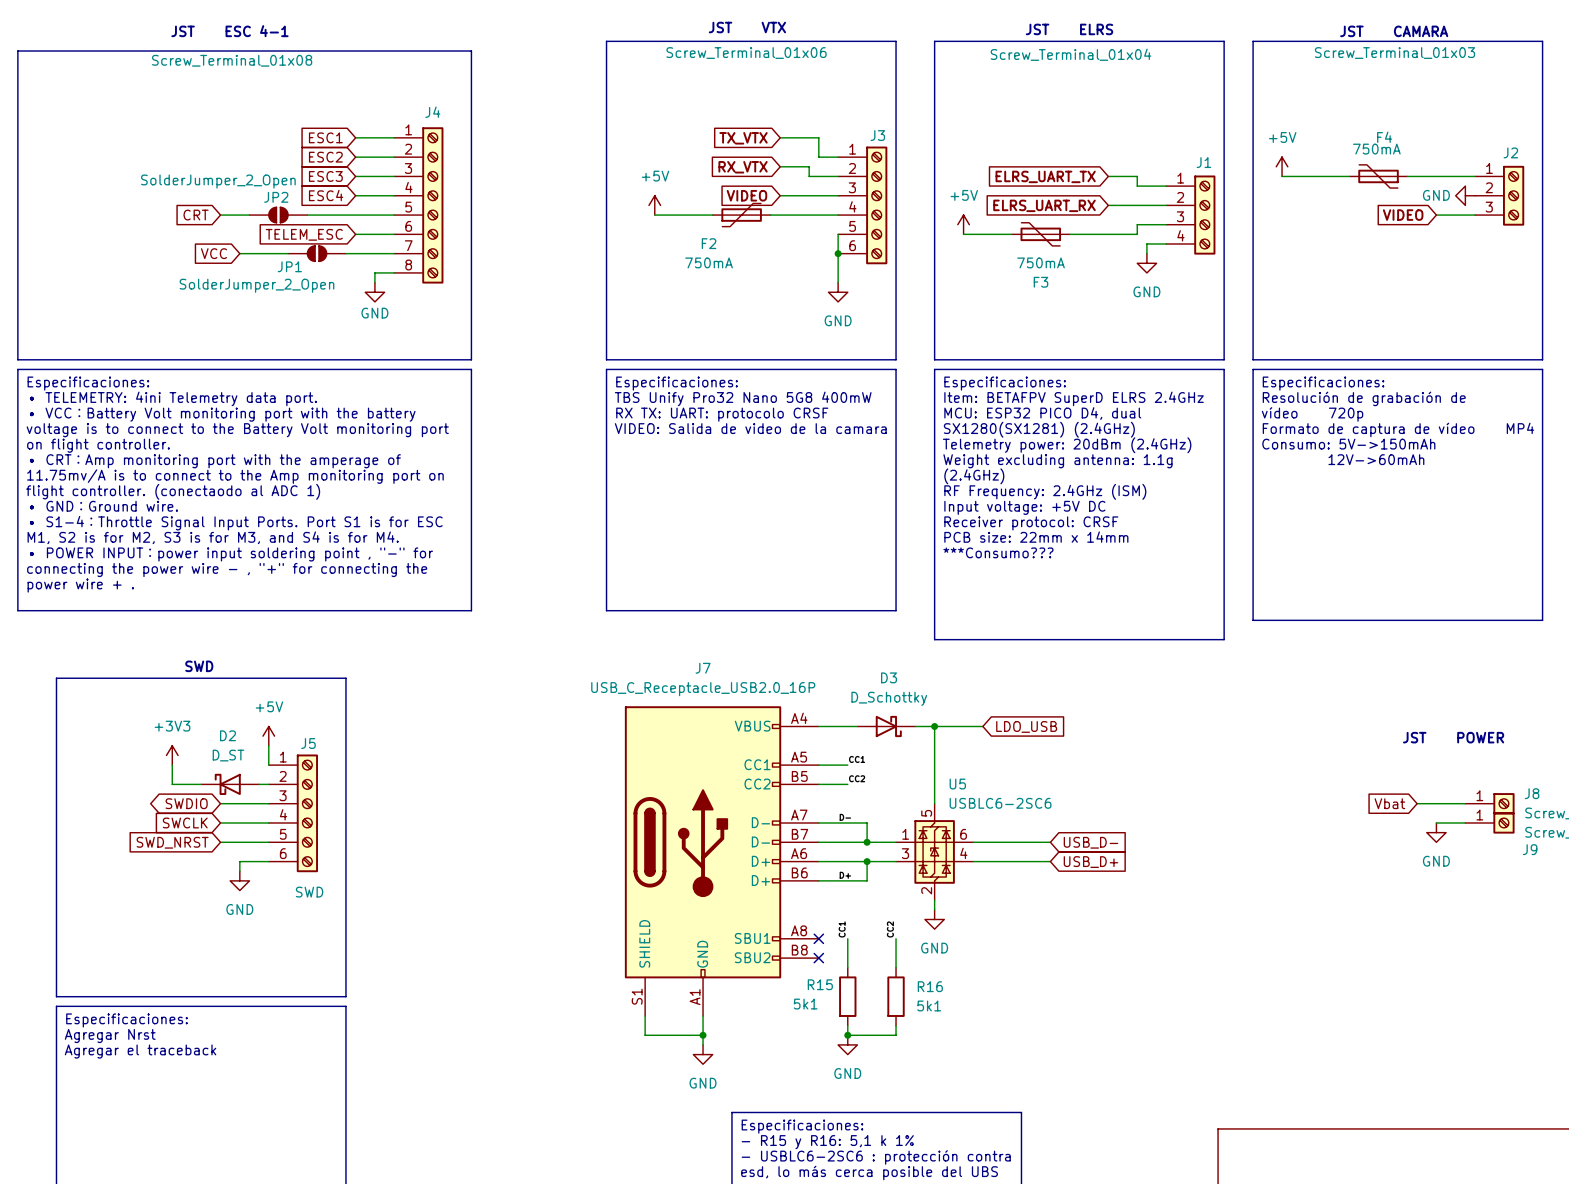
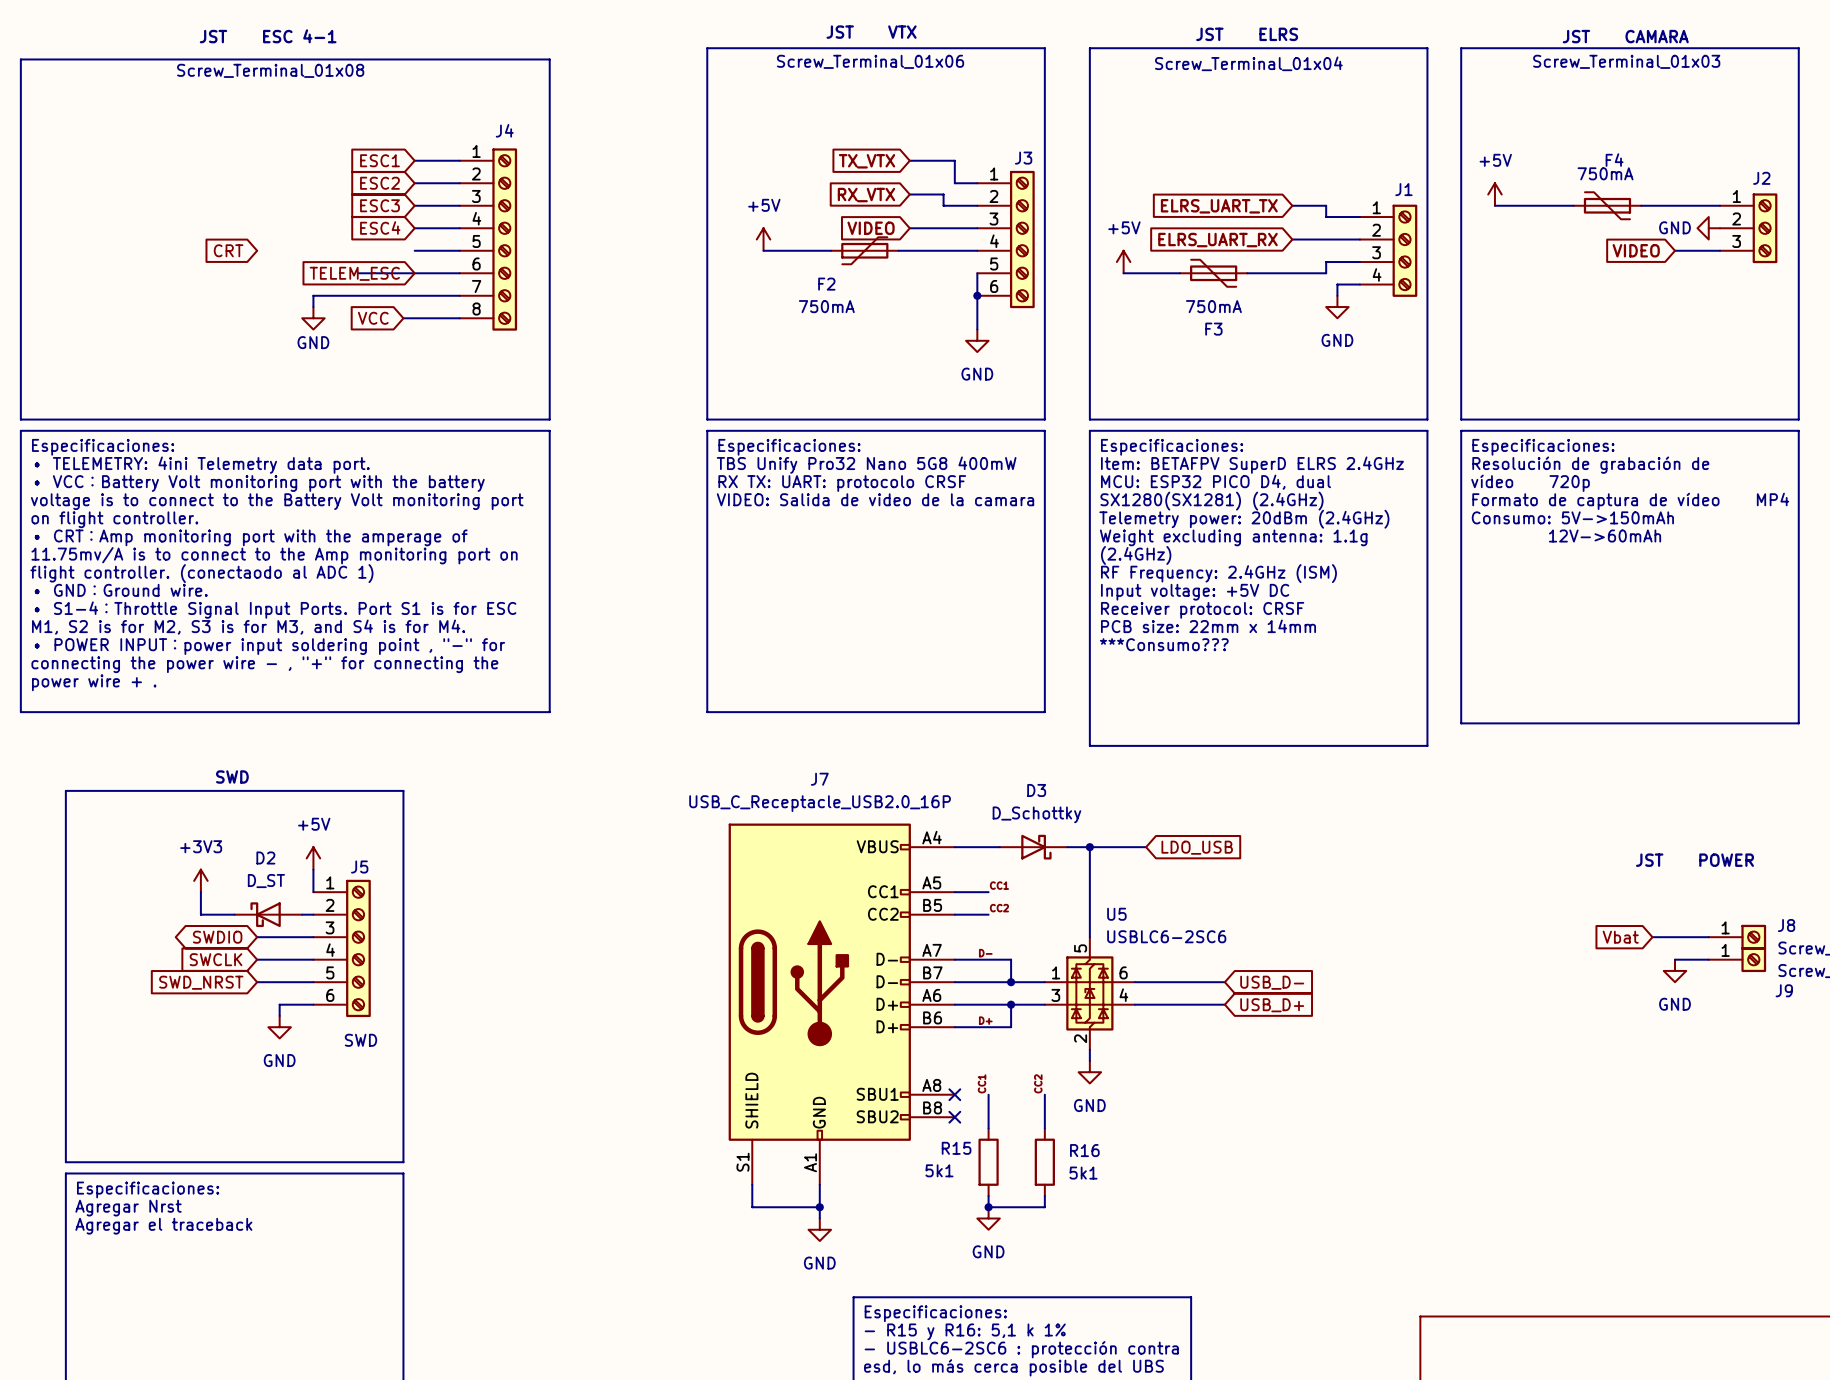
wire: (220, 215) (249, 215) -> none
JP2: SolderJumper_2_Open (278, 215) -> none
wire: (307, 215) (355, 215) -> (358, 273) (414, 273)
global label position: VCC (213, 253) -> VCC (373, 318)
wire: (239, 253) (268, 253) -> (313, 307) (313, 295)
JP1: SolderJumper_2_Open (317, 253) -> none
wire: (374, 272) (374, 282) -> (437, 318) (403, 318)
power symbol position: GND (374, 292) -> GND (313, 318)

